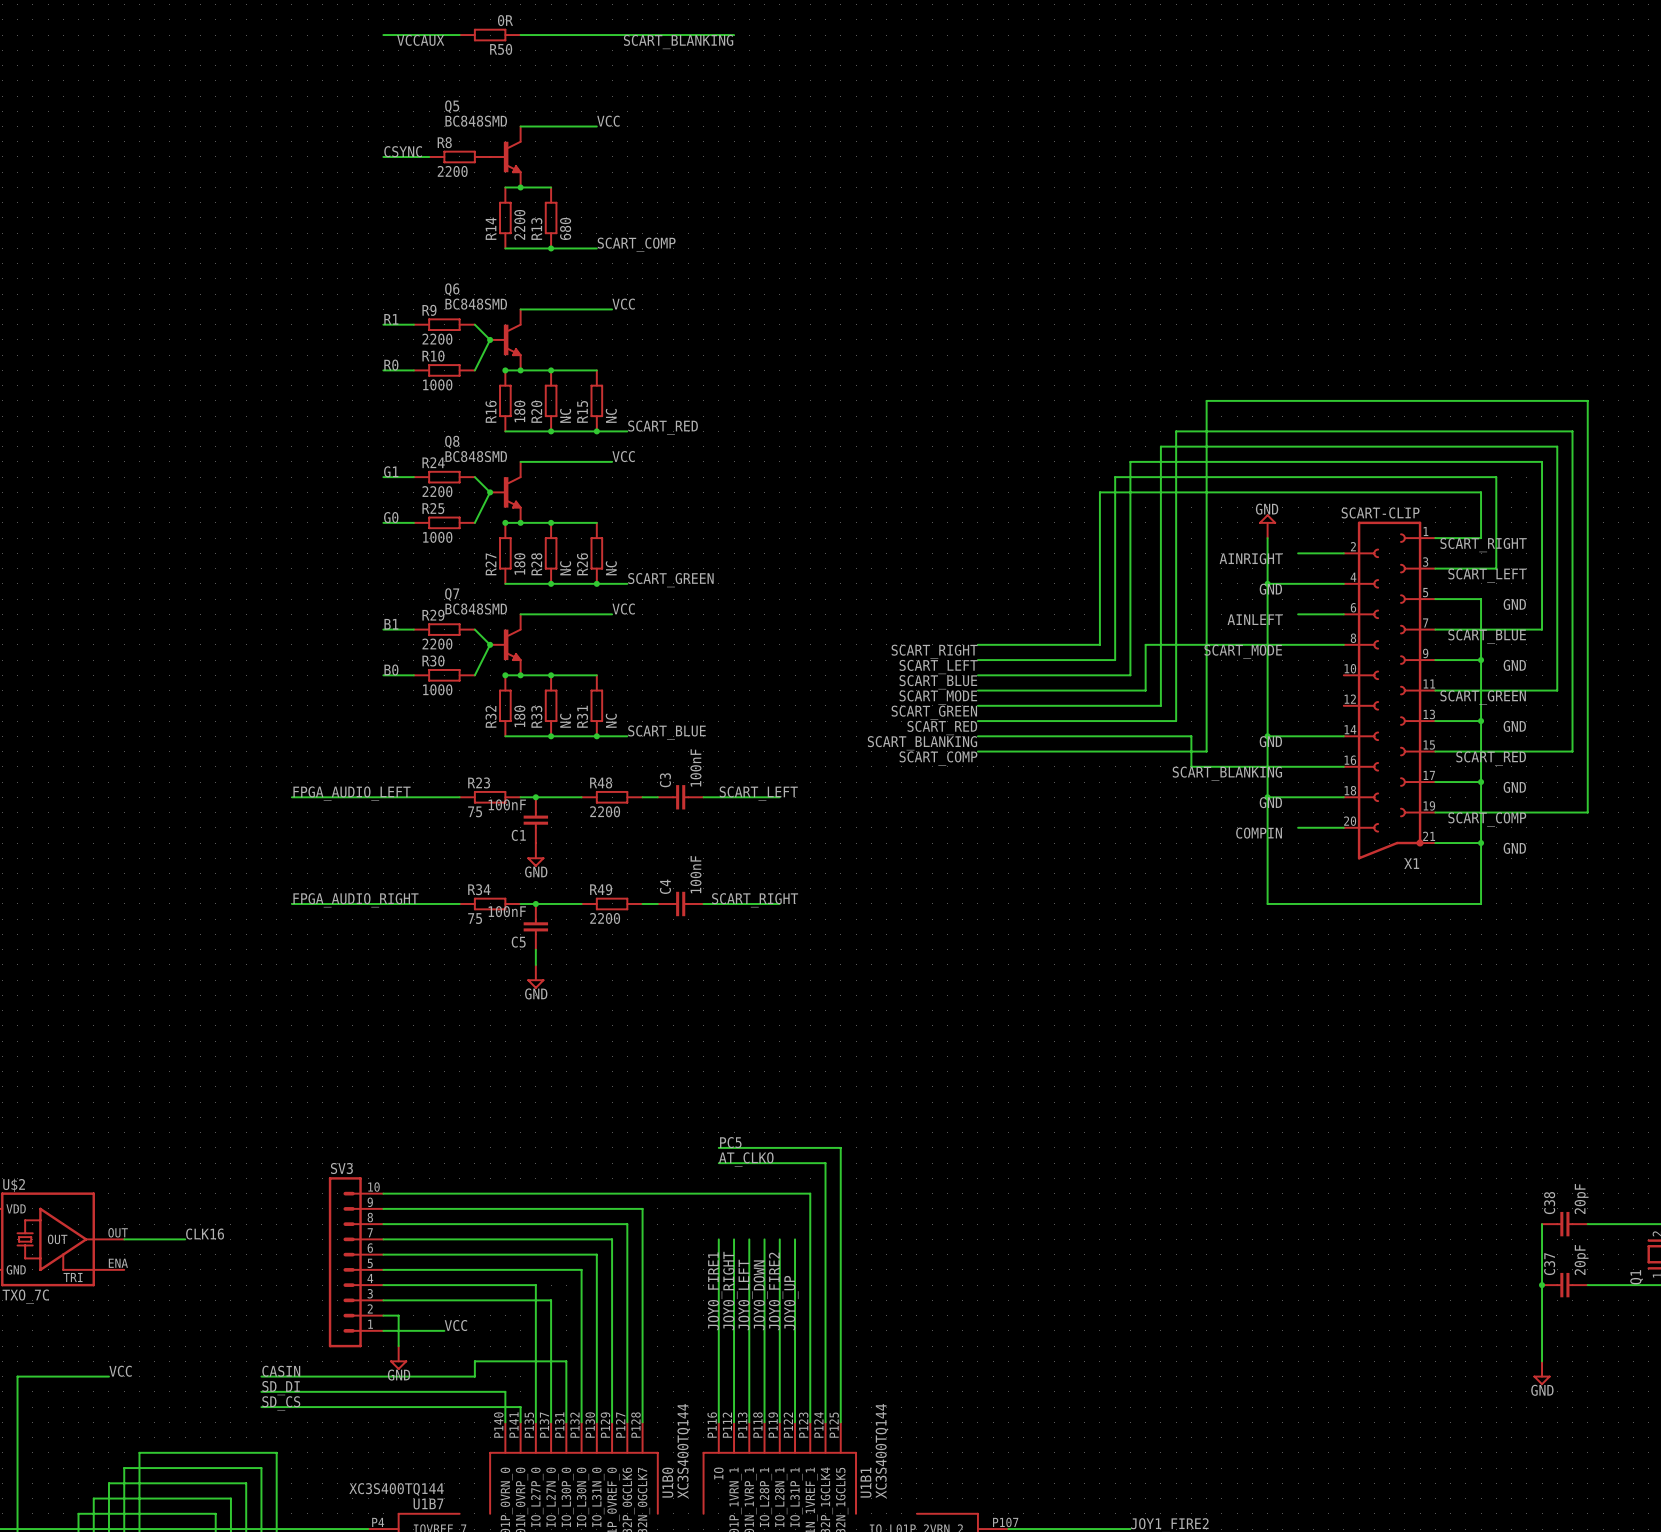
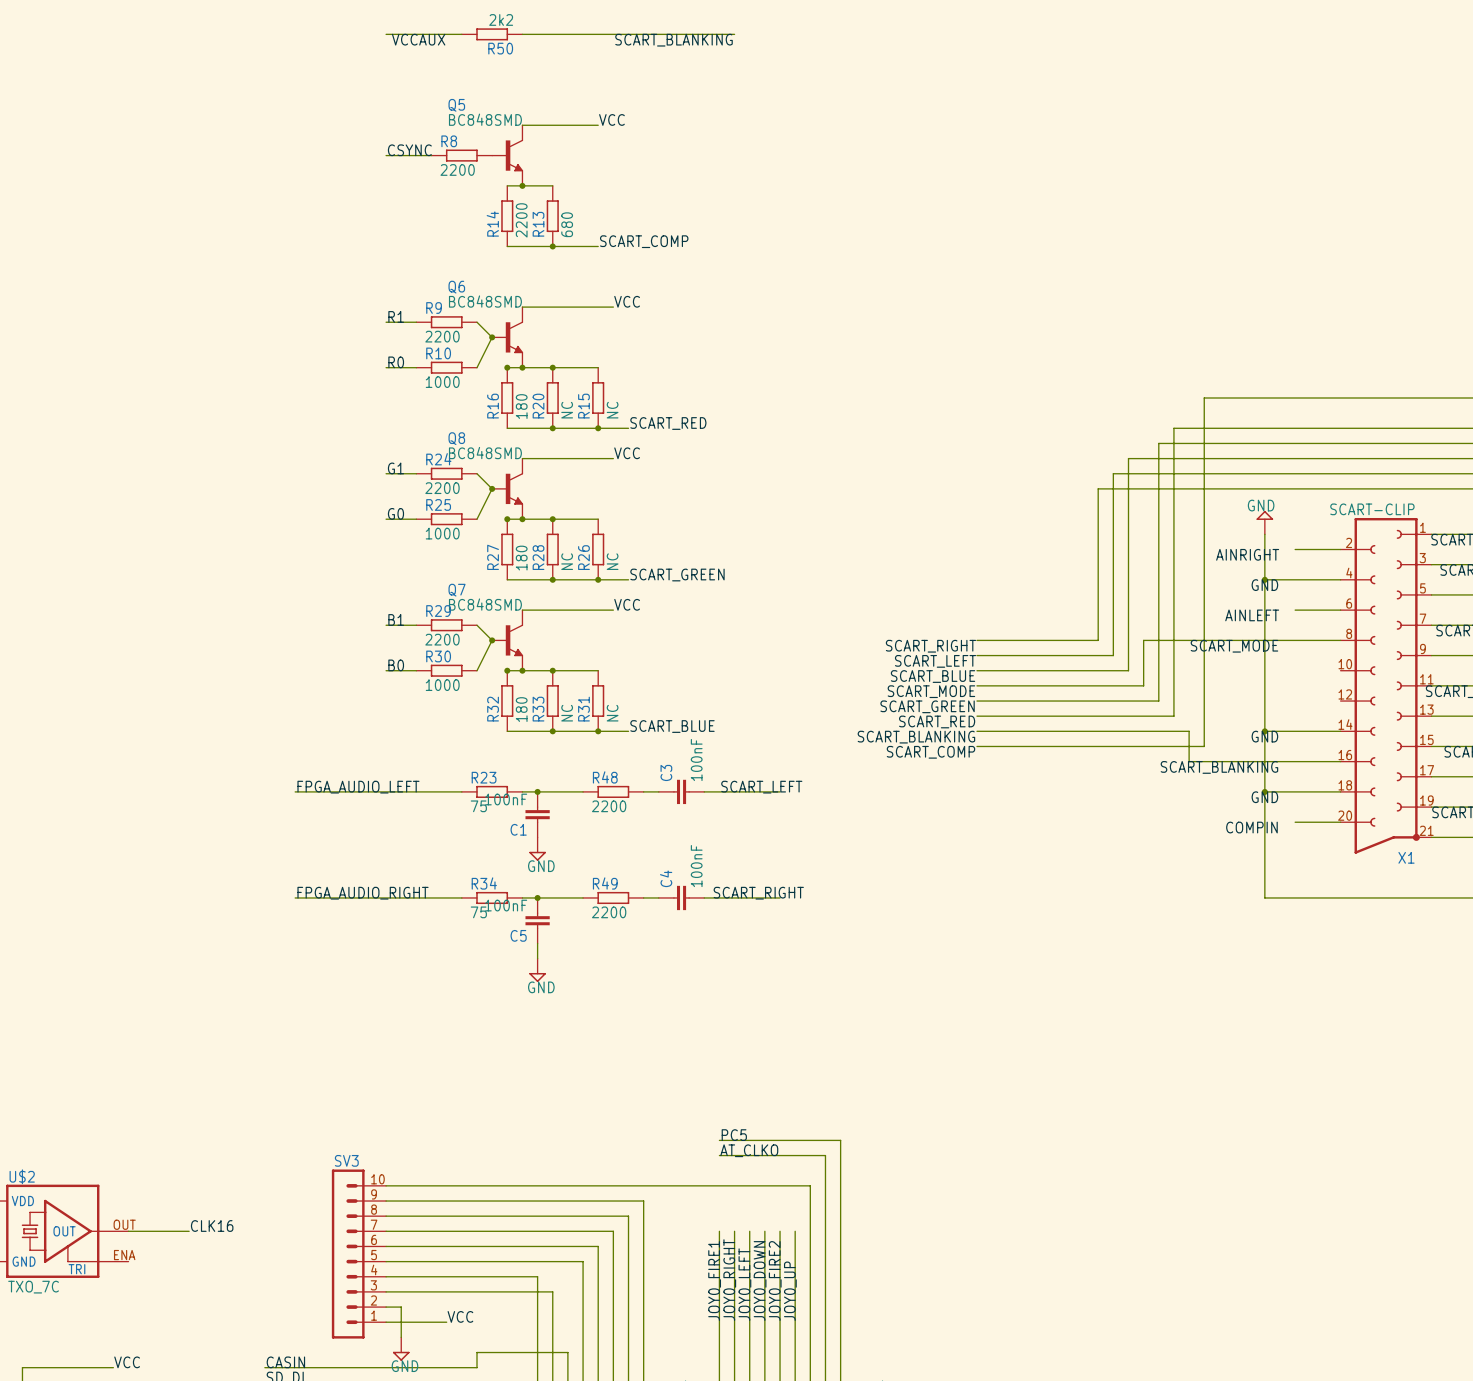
R50 value: 0R (505, 20) -> 2k2 (501, 19)

